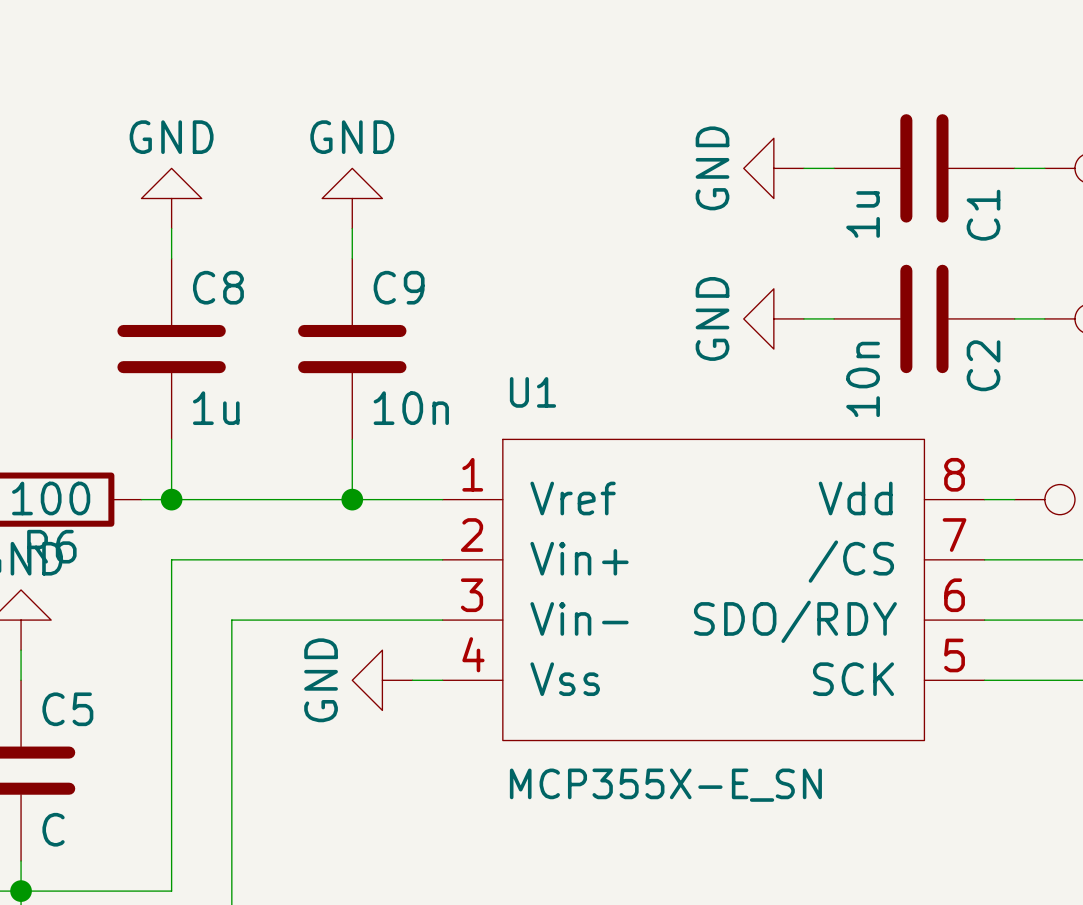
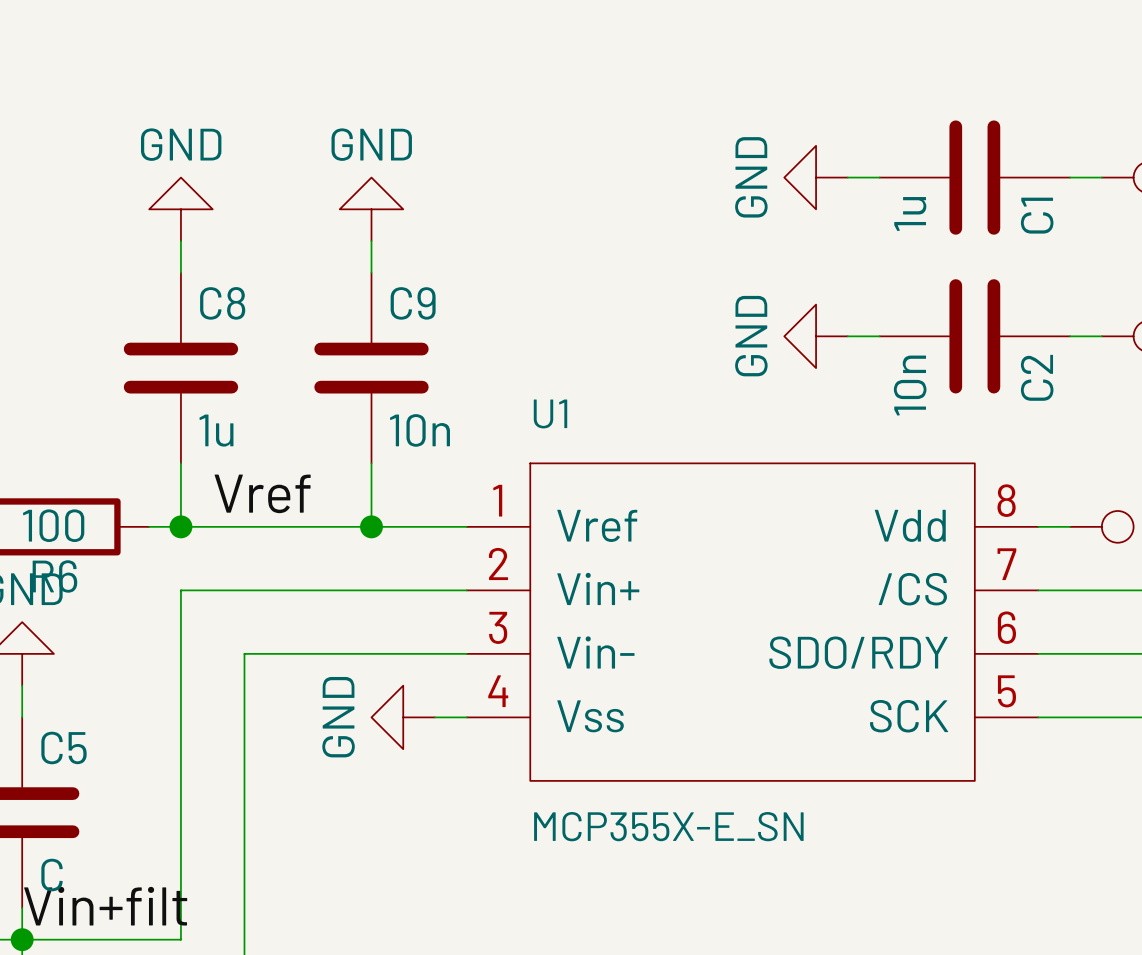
label: none -> Vref (262, 493)
label: none -> Vin+filt (105, 906)

